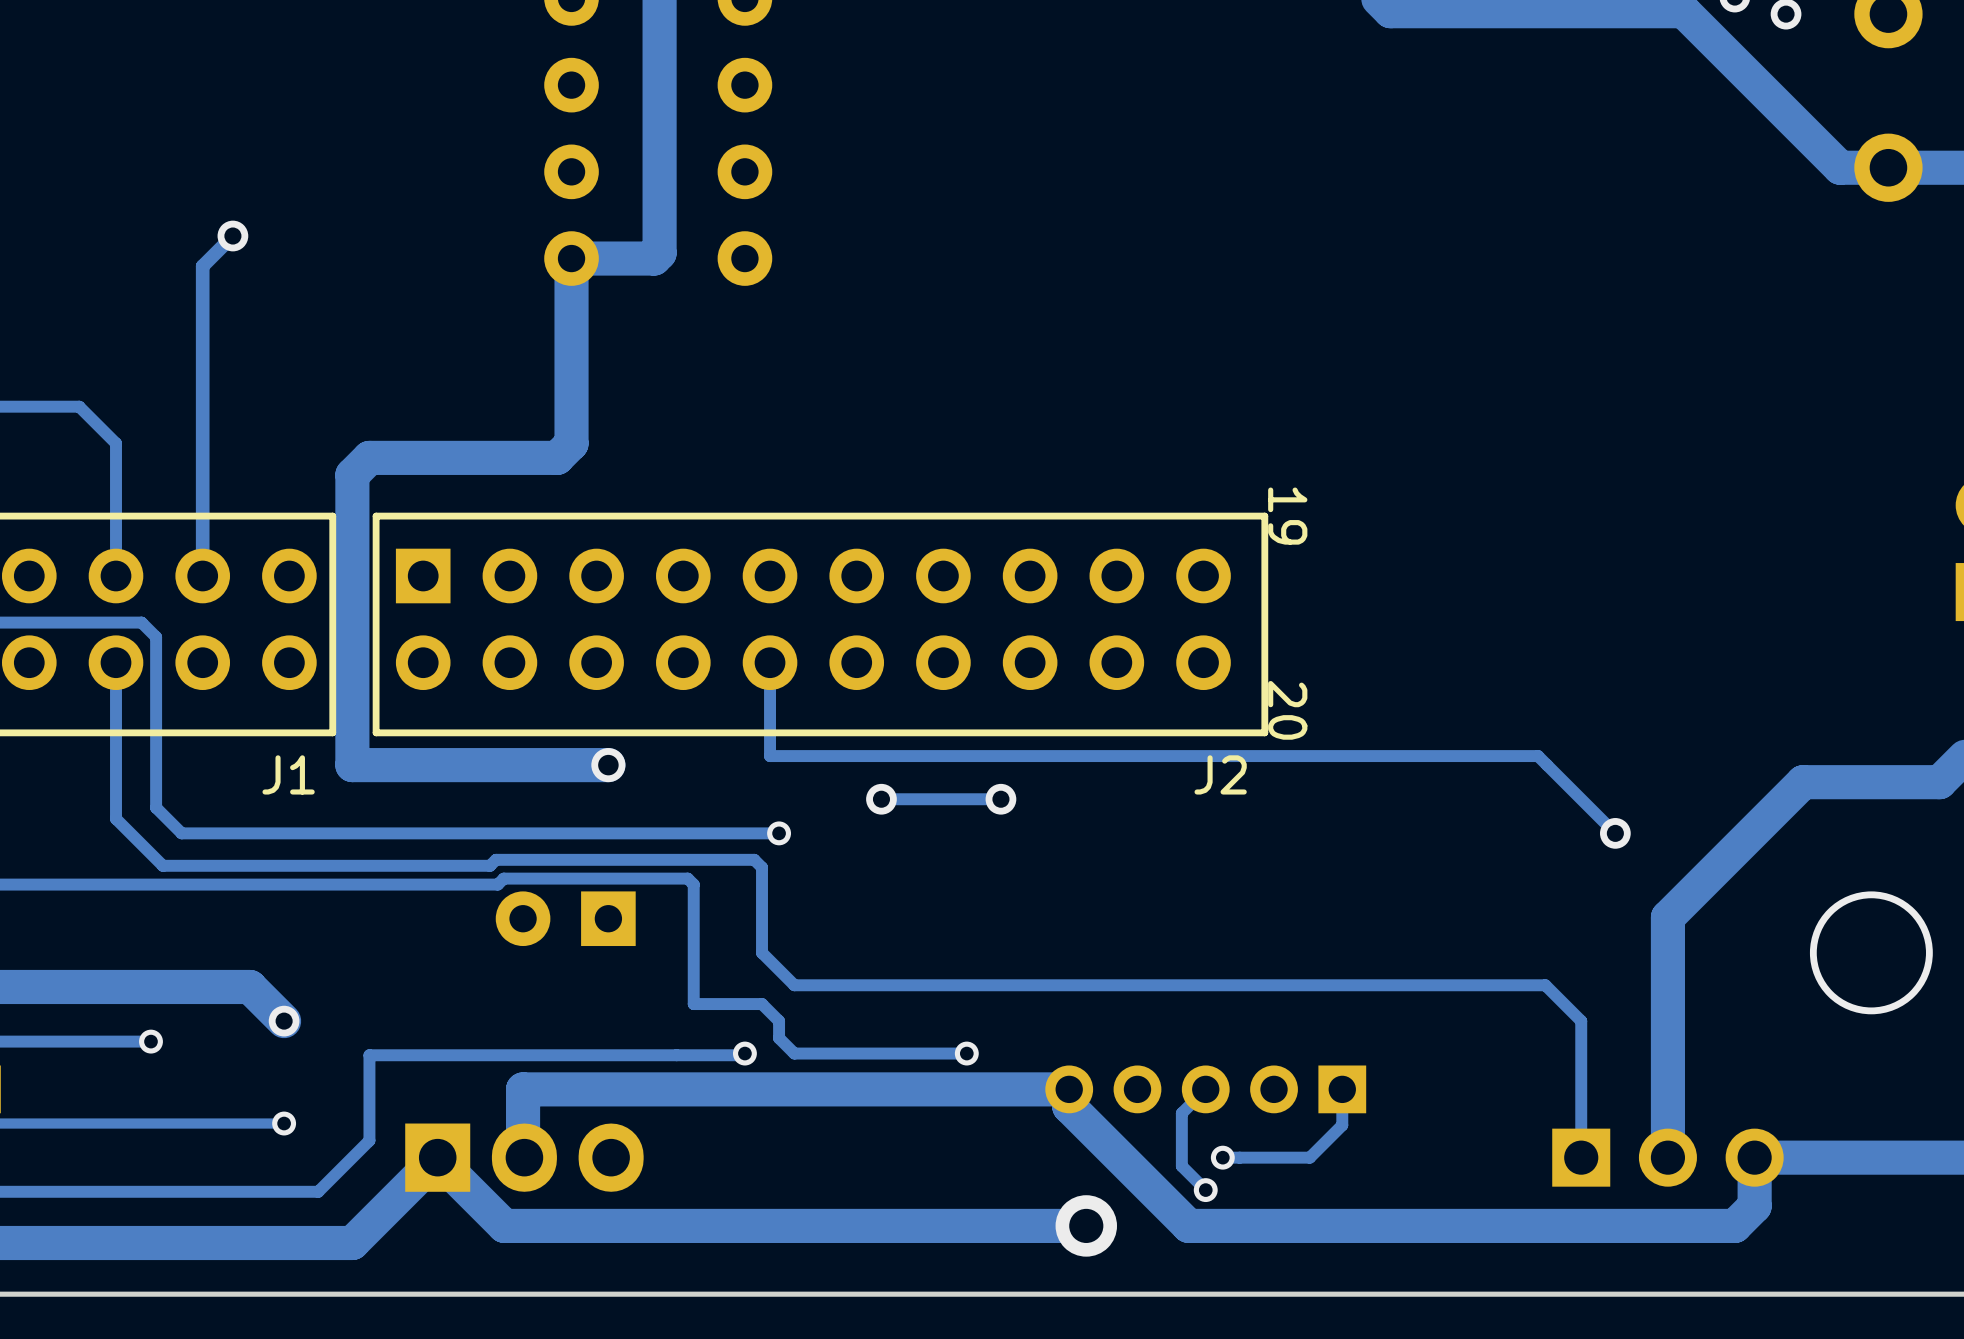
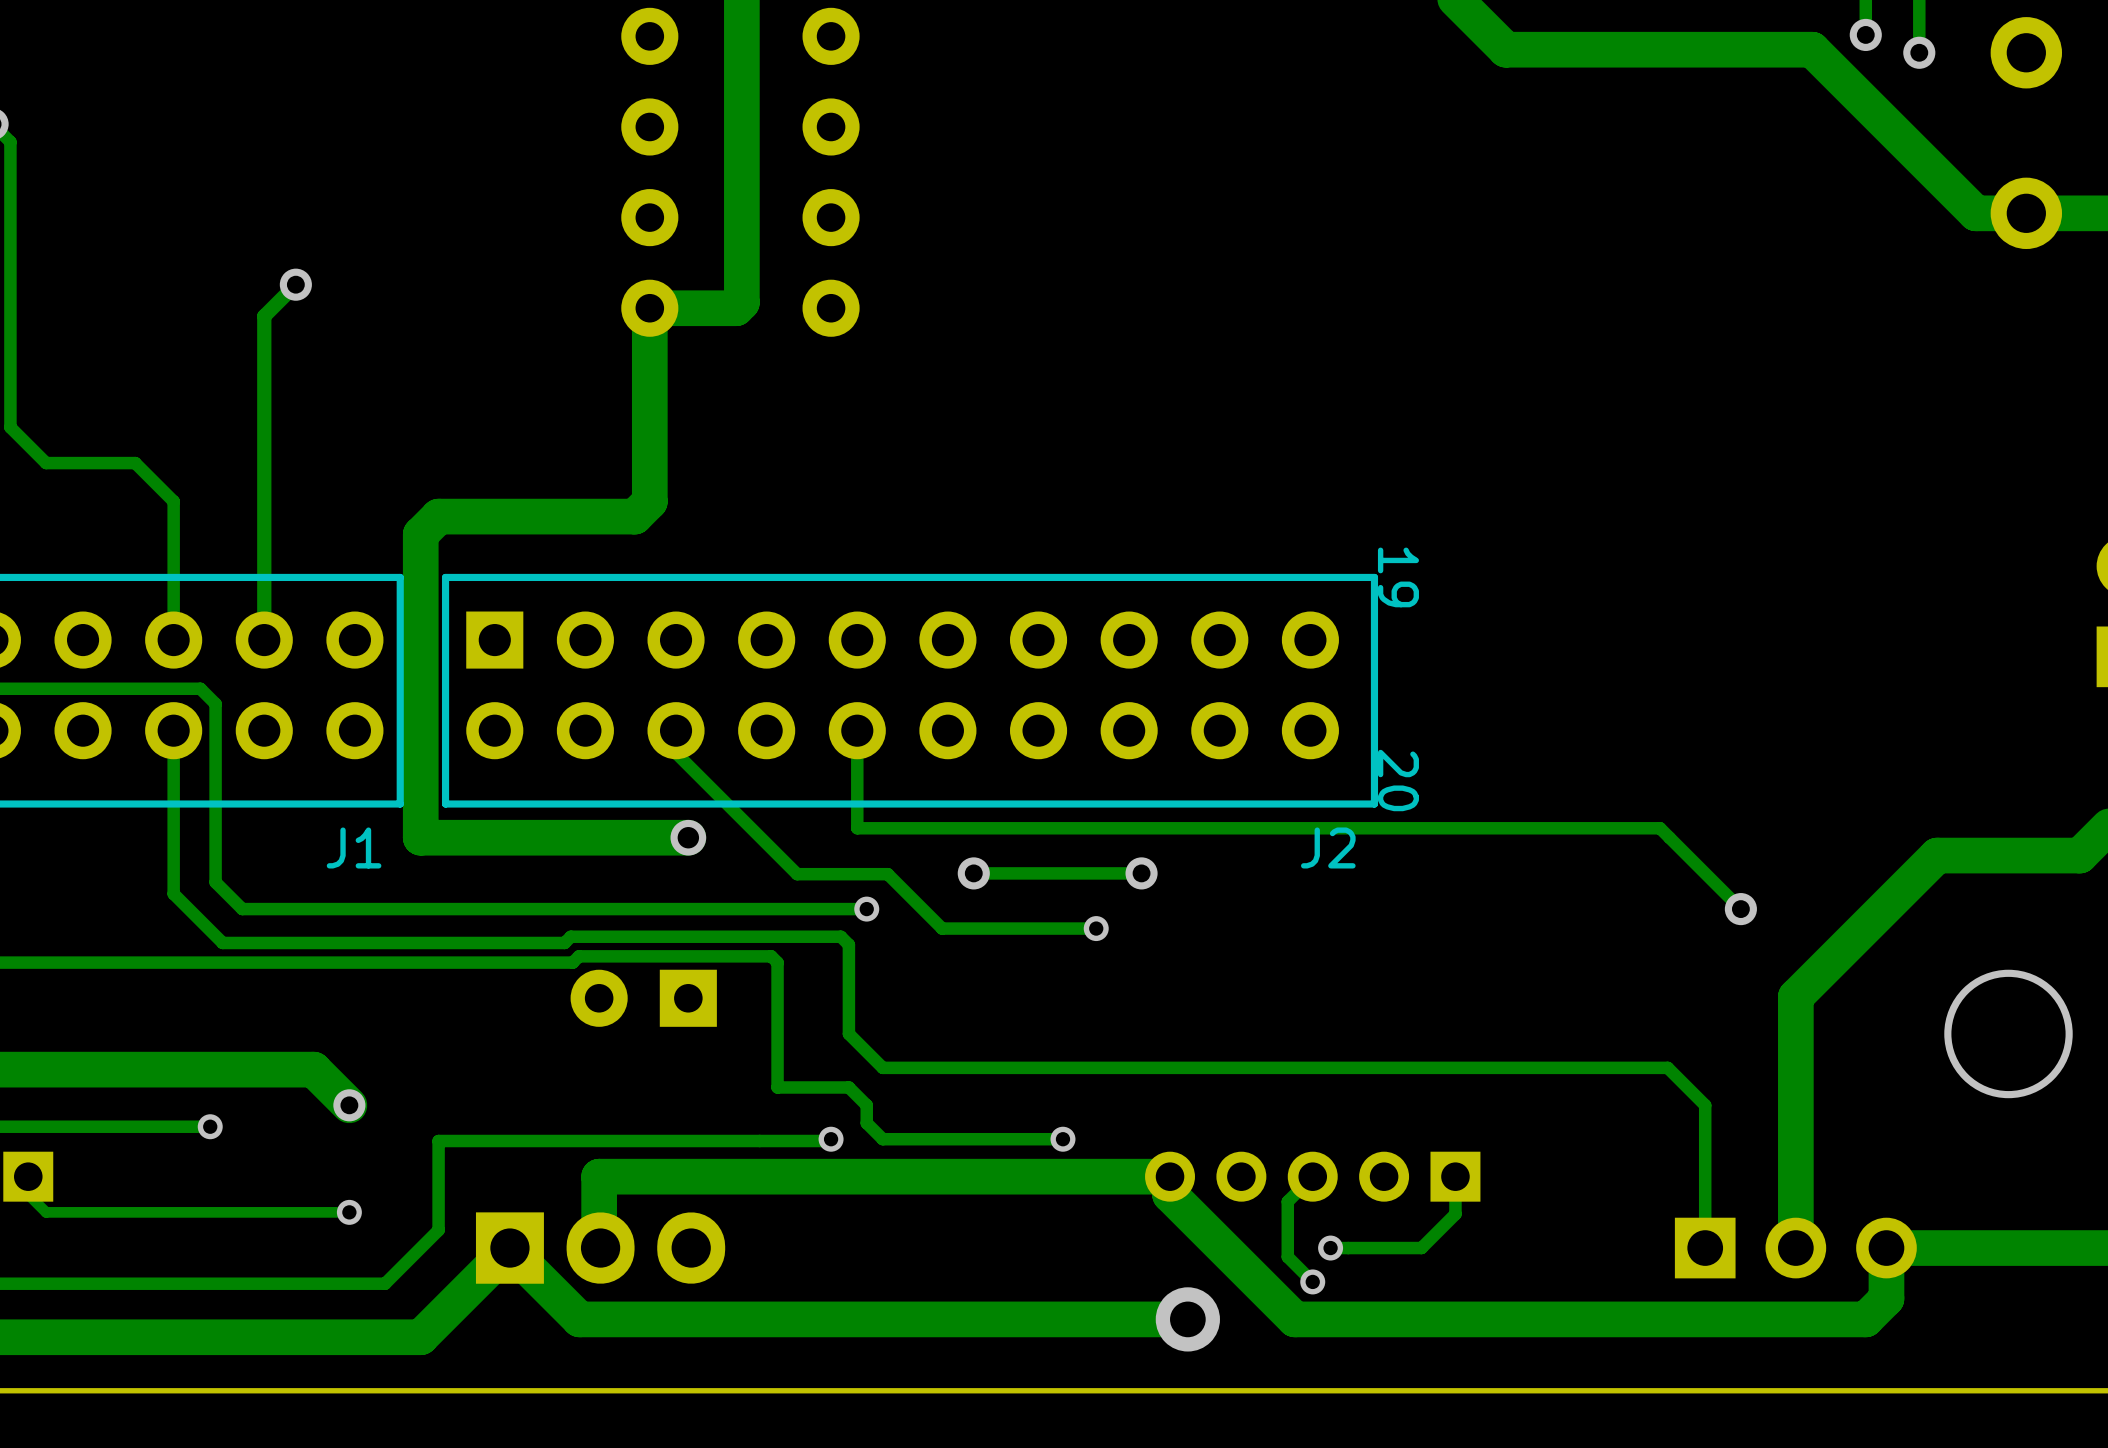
track: none -> (676, 730) (676, 753) (797, 874) (887, 874) (942, 928) (1096, 928)
via position: (1000, 799) -> (1141, 873)
track: none -> (1141, 873) (1098, 873)
via: none -> (1096, 928)

